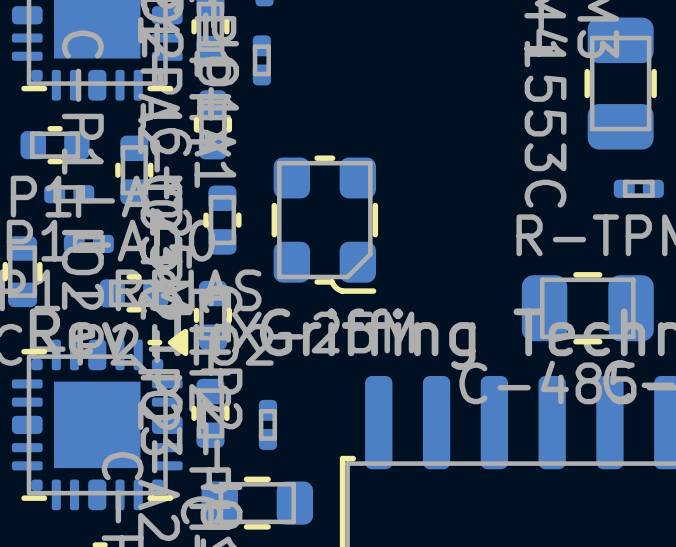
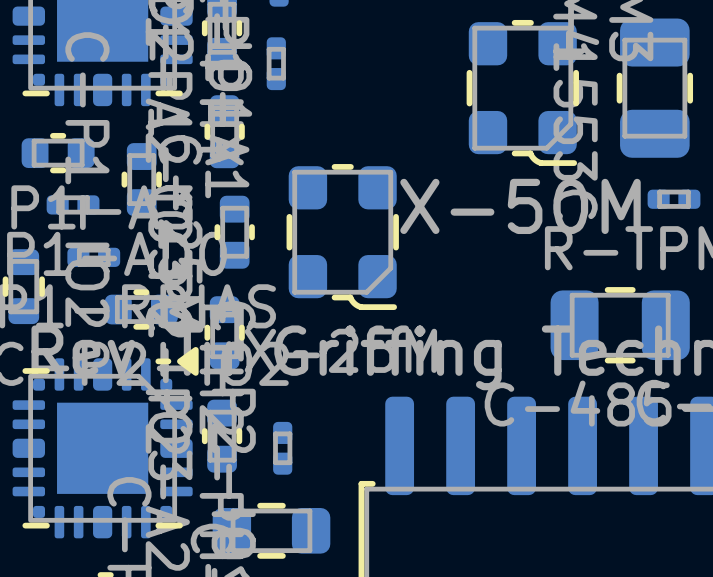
X-50M: none -> (522, 92)

